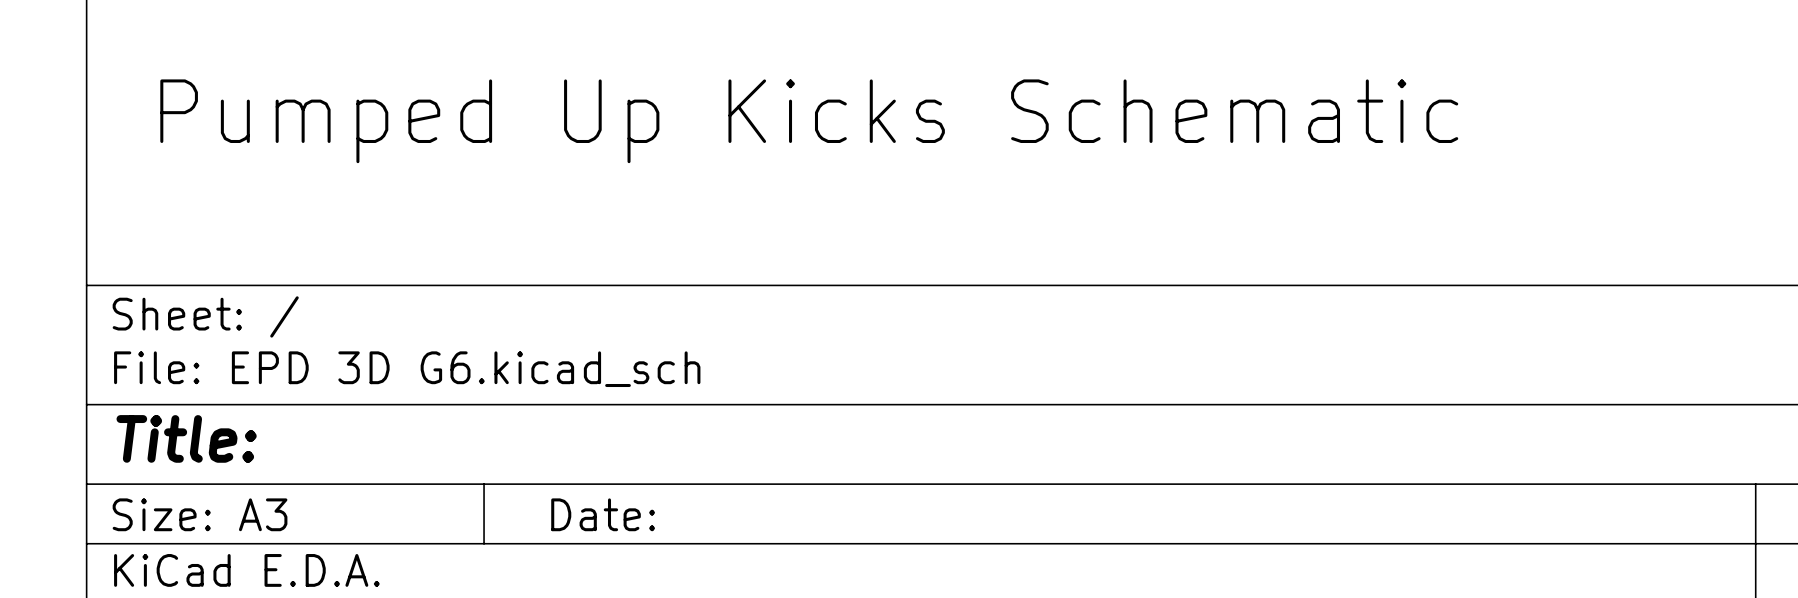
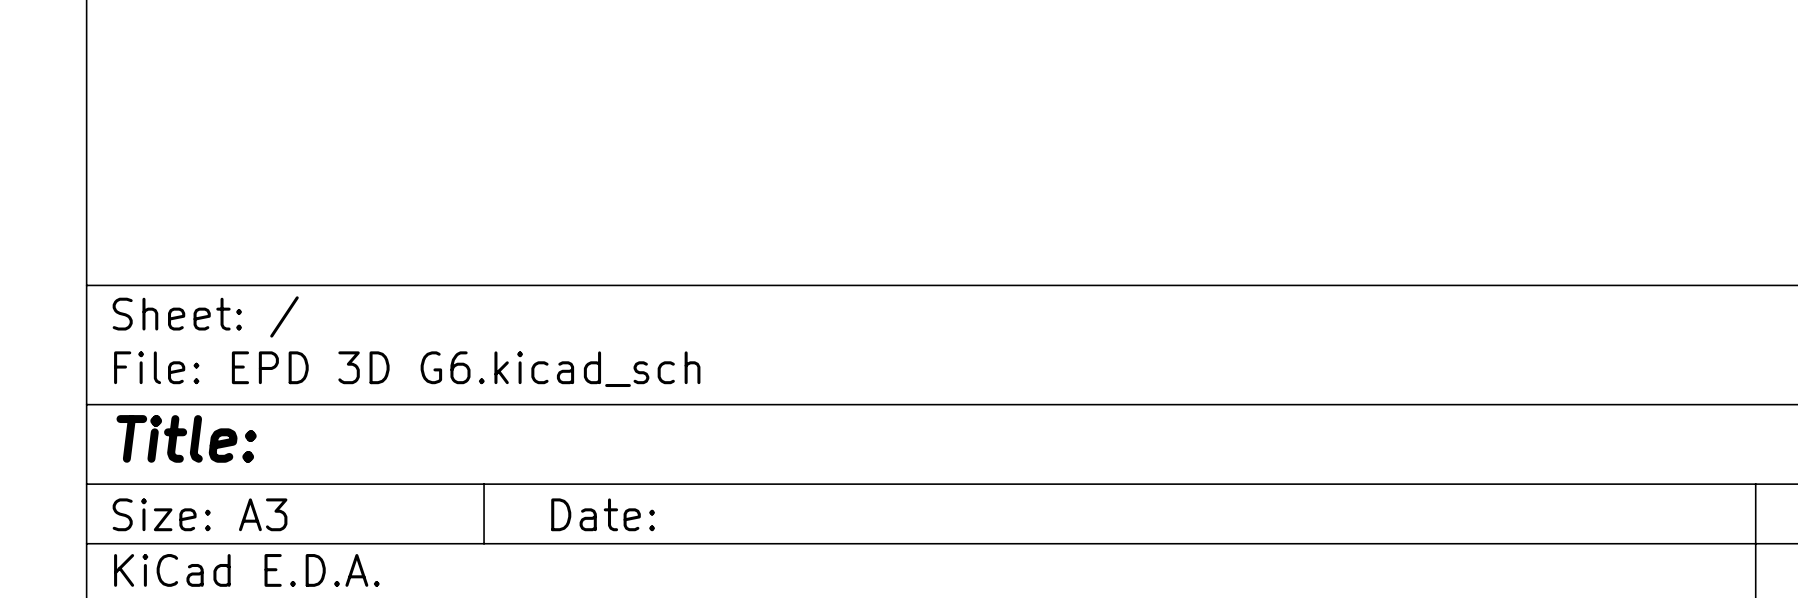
text: Pumped Up Kicks Schematic (809, 121) -> none

